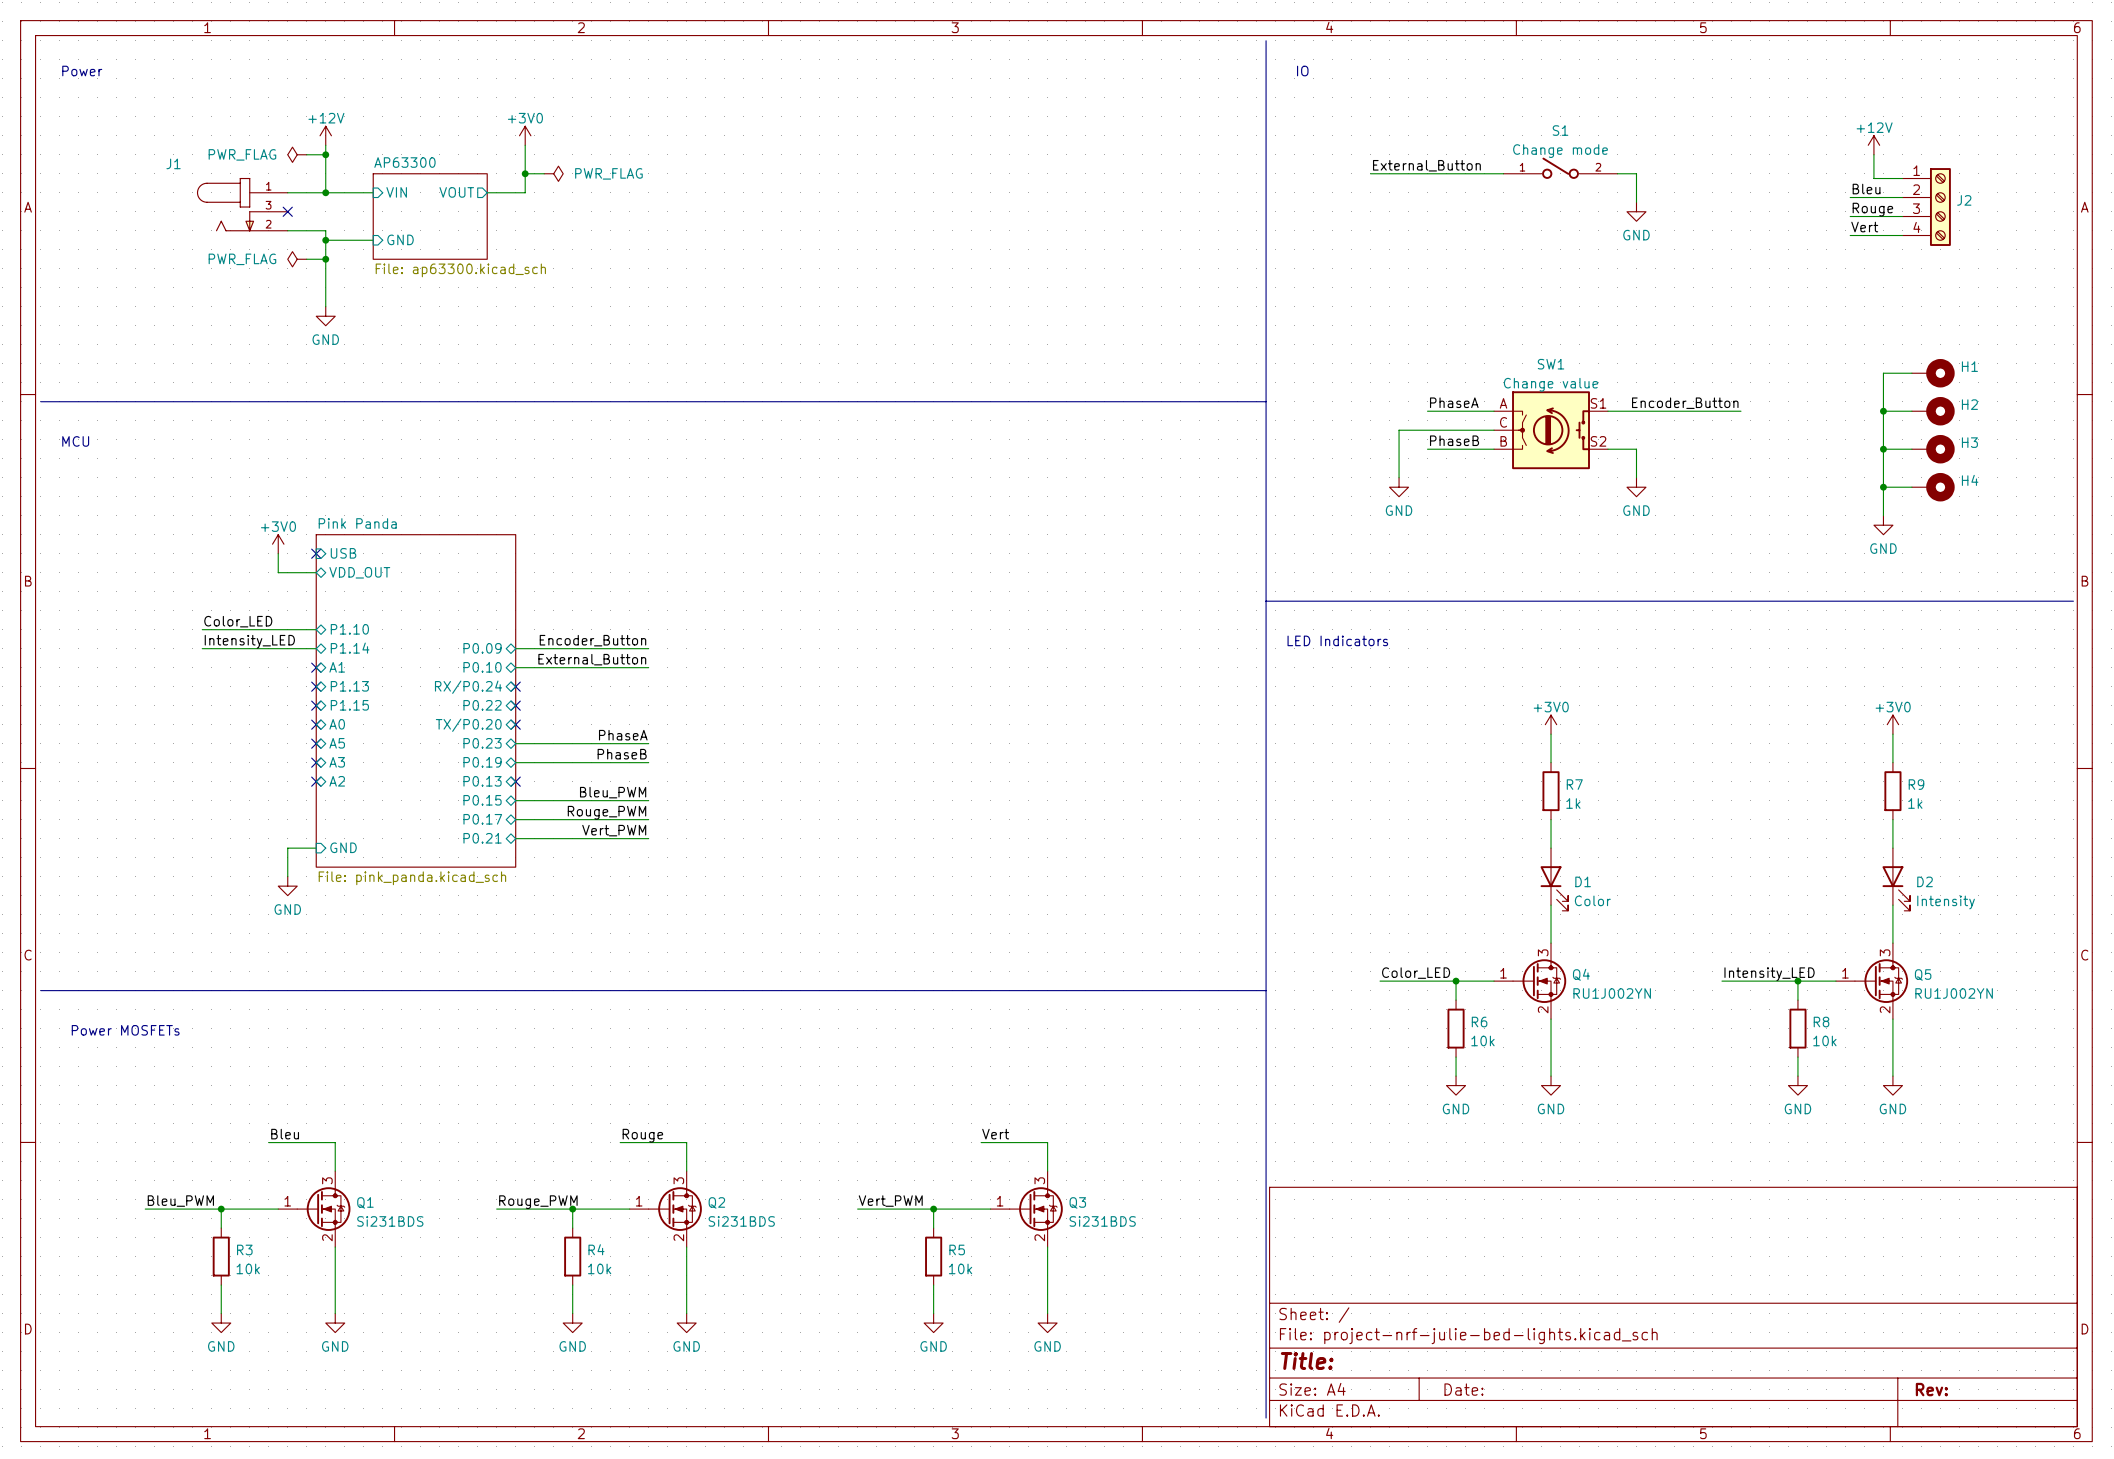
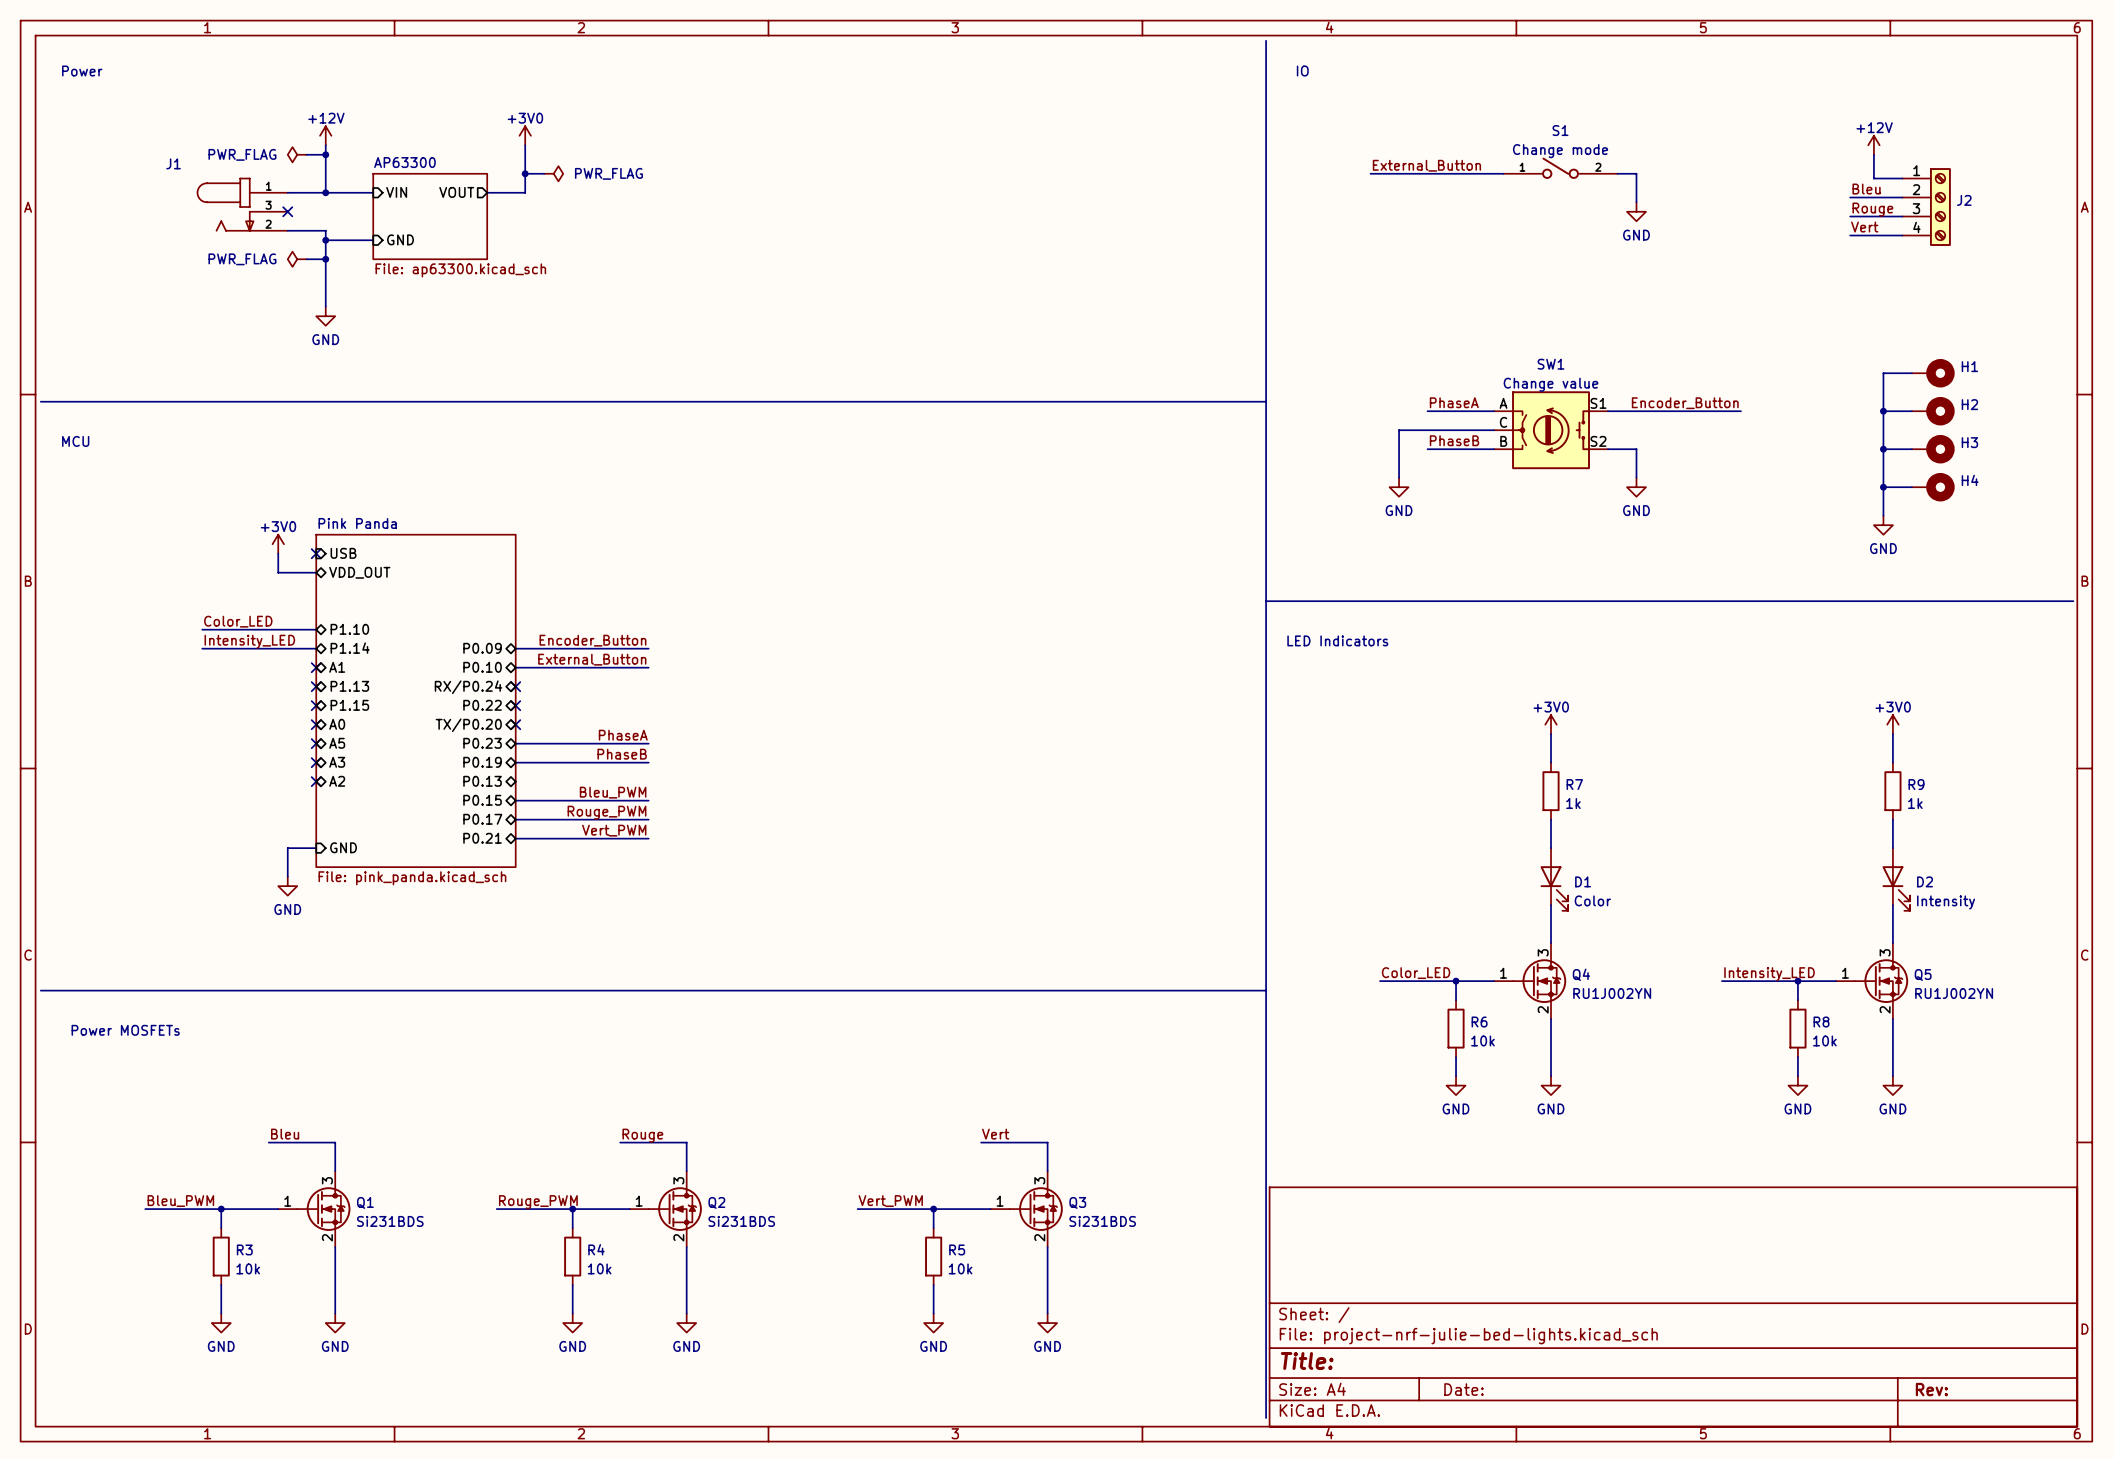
no-connect mark: (515, 781) -> none

